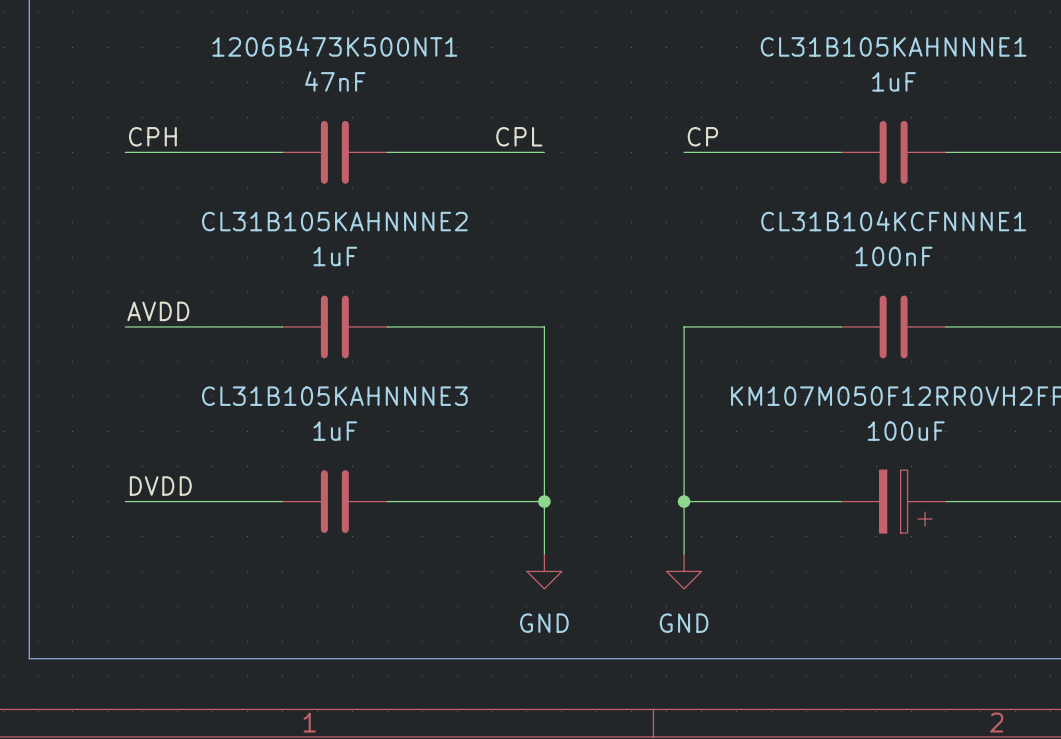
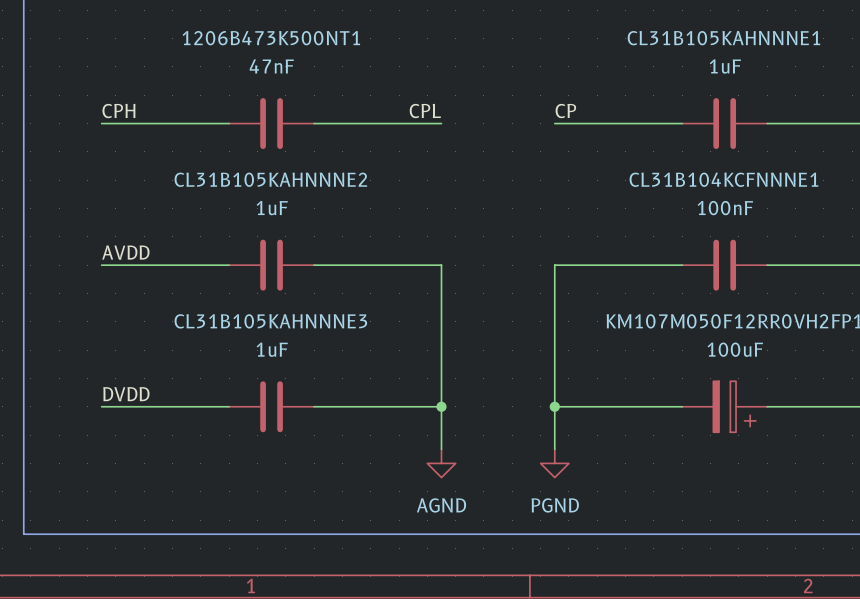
power symbol: GND (544, 571) -> AGND (441, 463)
power symbol: GND (684, 571) -> PGND (554, 463)

